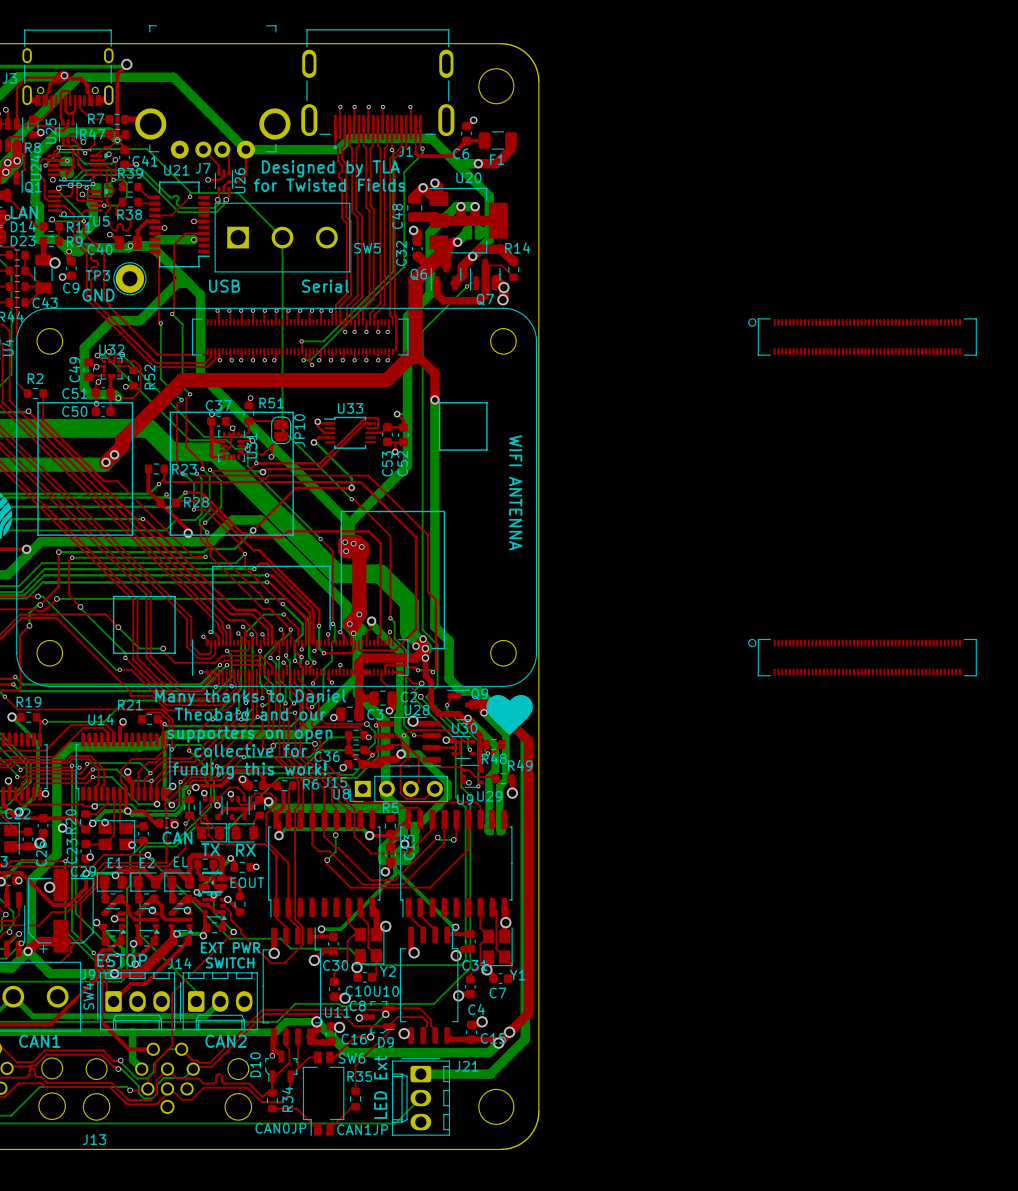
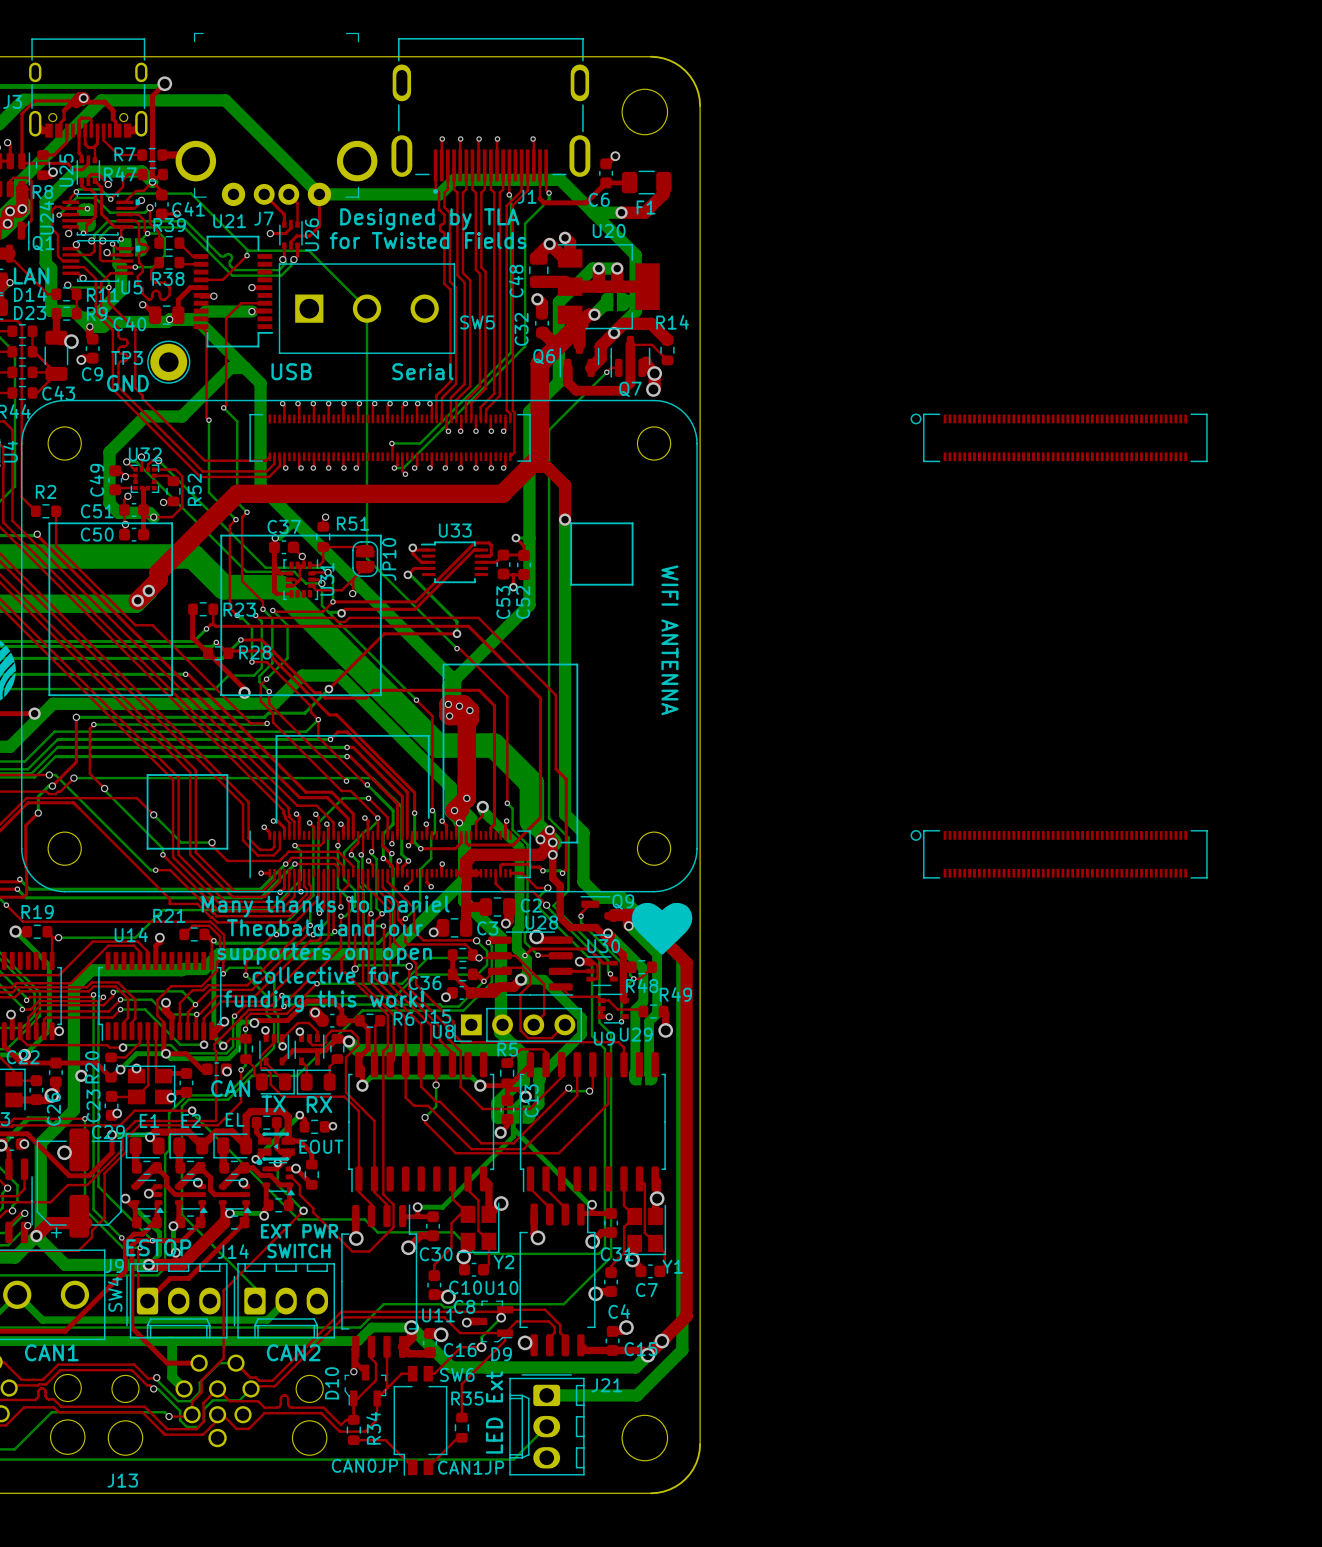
part position: (862, 337) -> (1059, 437)
part position: (862, 657) -> (1059, 854)

